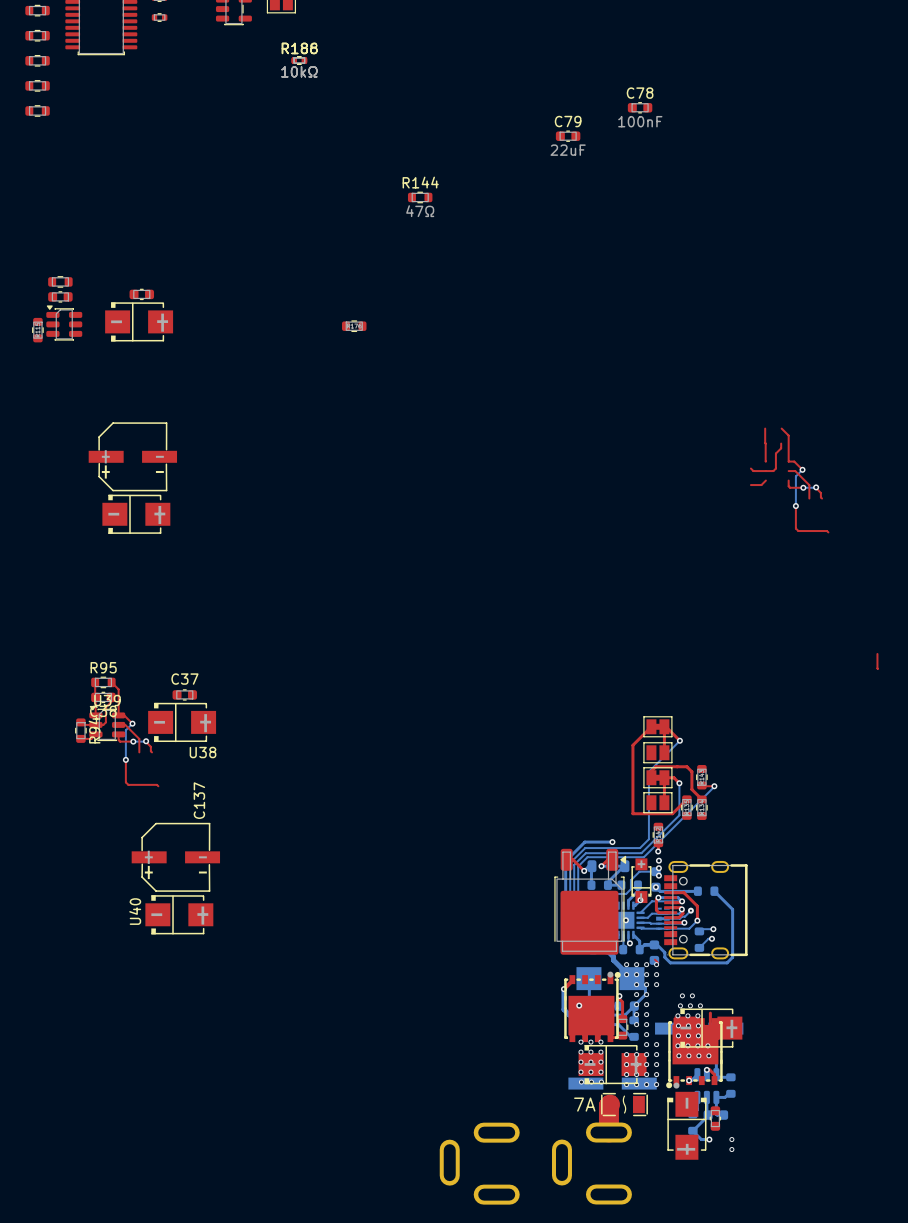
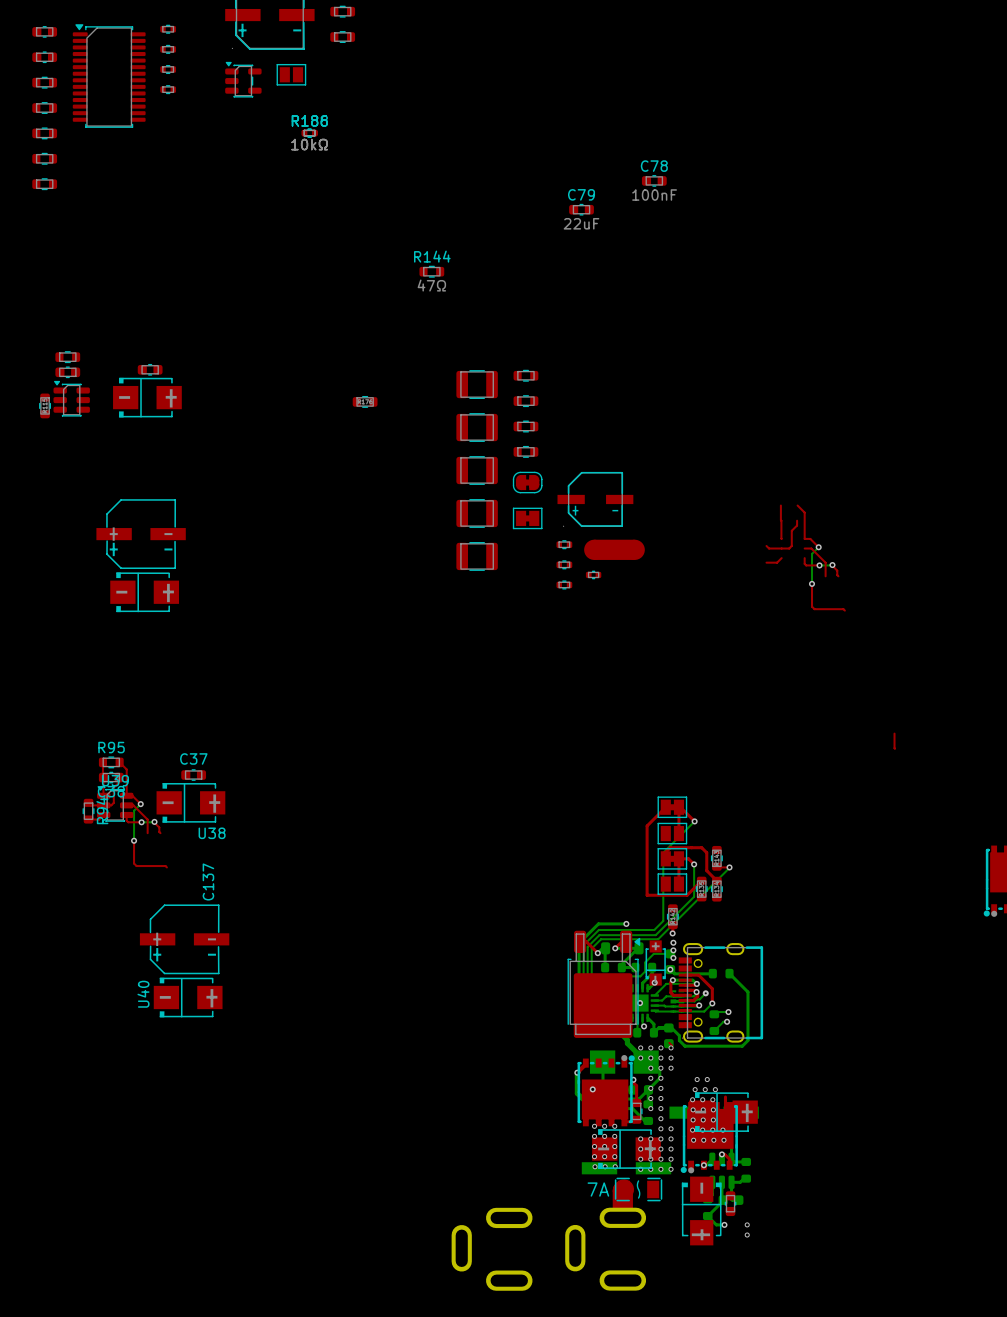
part: none -> (525, 375)
part: none -> (477, 384)
part: none -> (525, 401)
part: none -> (525, 426)
part: none -> (477, 427)
part: none -> (525, 451)
part: none -> (477, 470)
part: none -> (527, 482)
part: none -> (595, 499)
part: none -> (477, 513)
part: none -> (527, 518)
part: none -> (564, 544)
part: none -> (614, 549)
part: none -> (477, 556)
part: none -> (564, 564)
part: none -> (593, 574)
part: none -> (564, 584)

